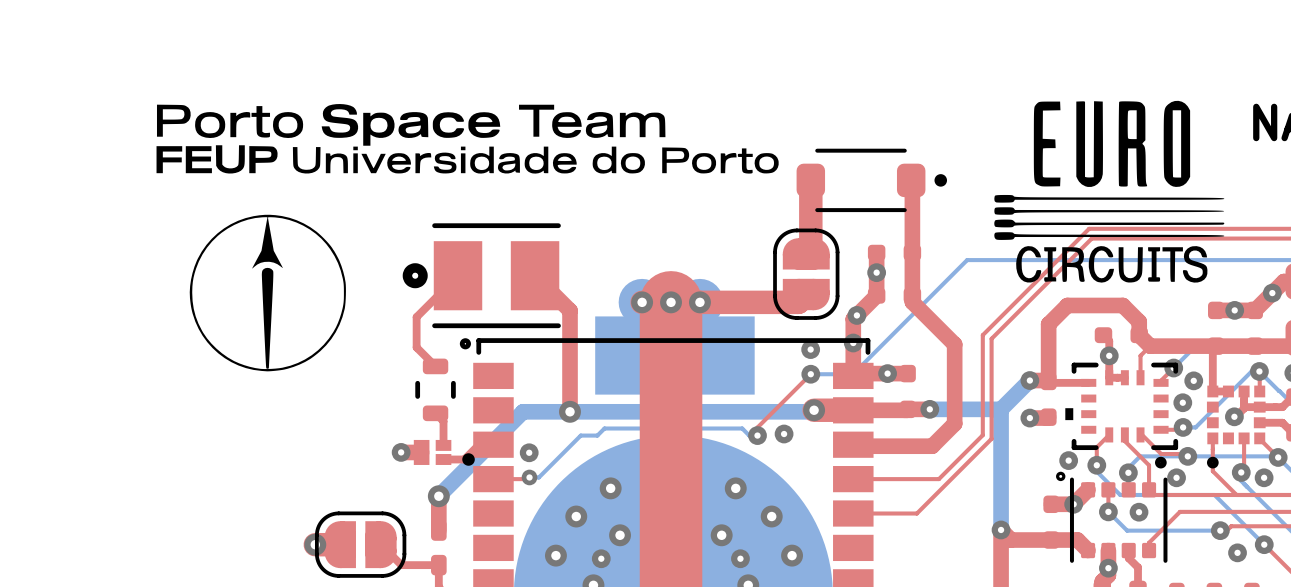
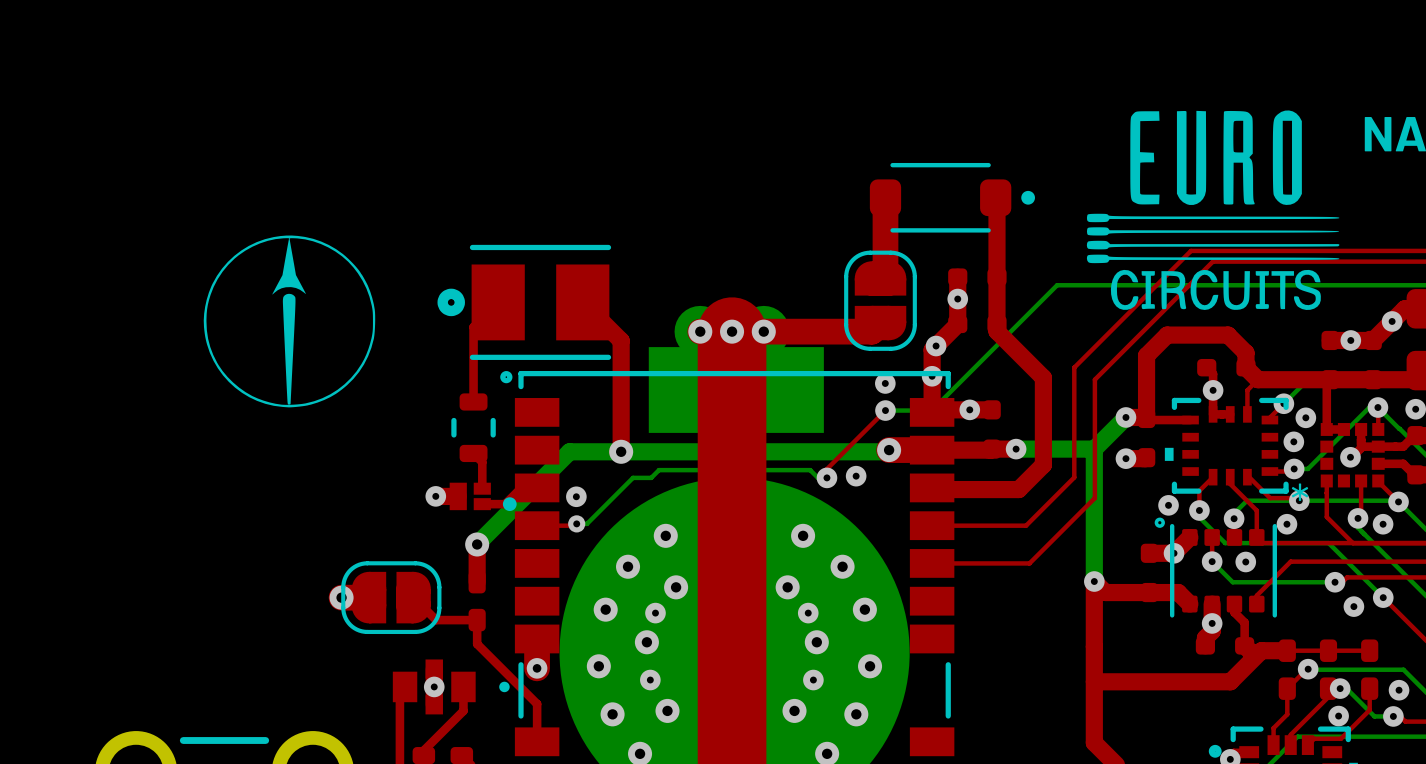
drawing: [156, 104, 779, 174] -> none
top track: (1109, 238) (1091, 238) (991, 338) (991, 438) (916, 513) -> (1212, 261) (1094, 379) (1094, 498) (1029, 563) (1001, 563)
top track: (435, 298) (416, 317) (416, 347) (435, 366) -> (473, 327) (473, 401)
part footprint: [1065, 362, 1179, 469] -> [1164, 397, 1289, 494]
part footprint: [1206, 385, 1266, 469] -> [1320, 423, 1385, 488]

